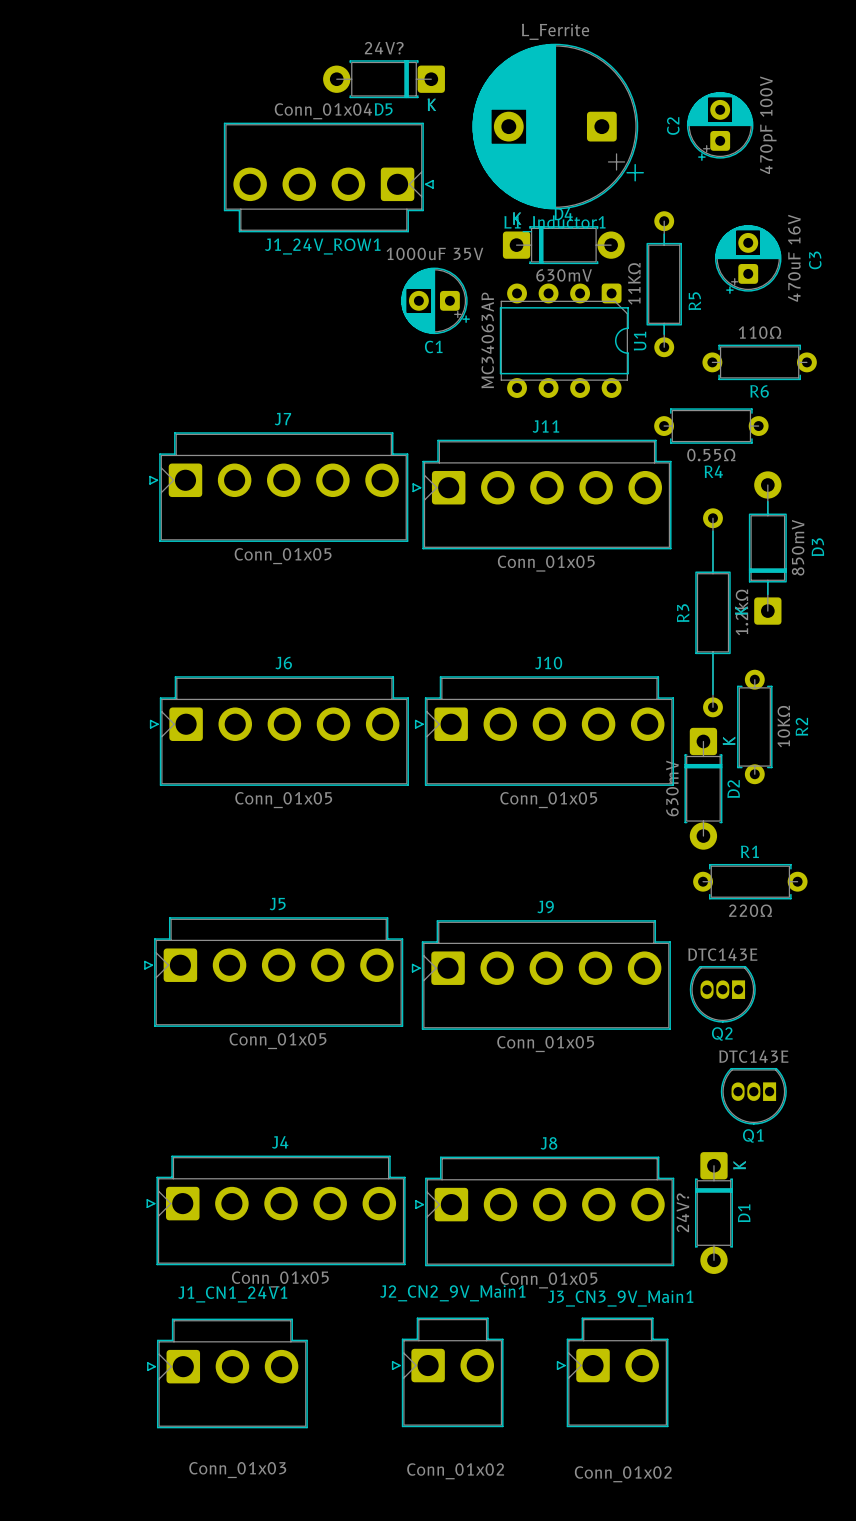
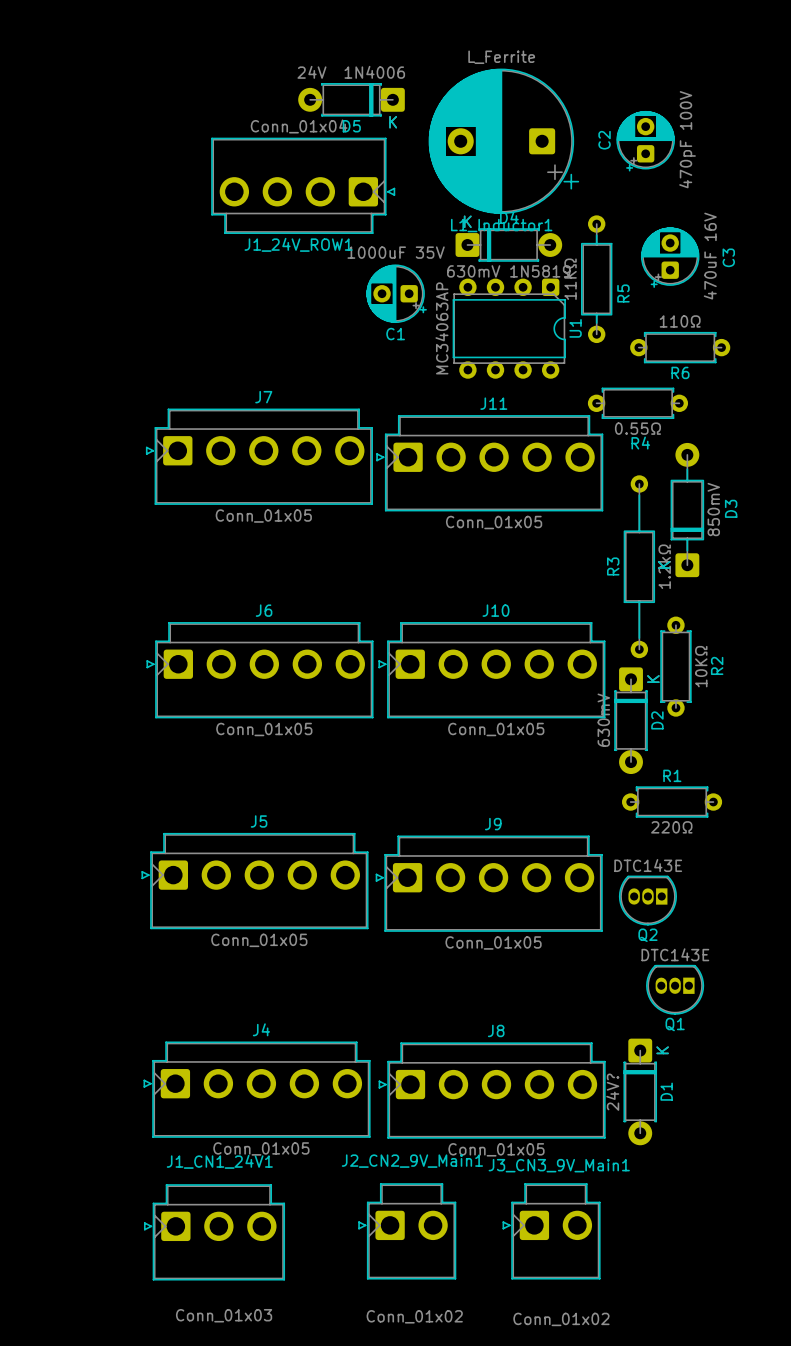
D5 value: 24V? (384, 48) -> 24V 1N4006 (351, 72)
D4 value: 630mV (564, 275) -> 630mV 1N5819 (508, 271)

